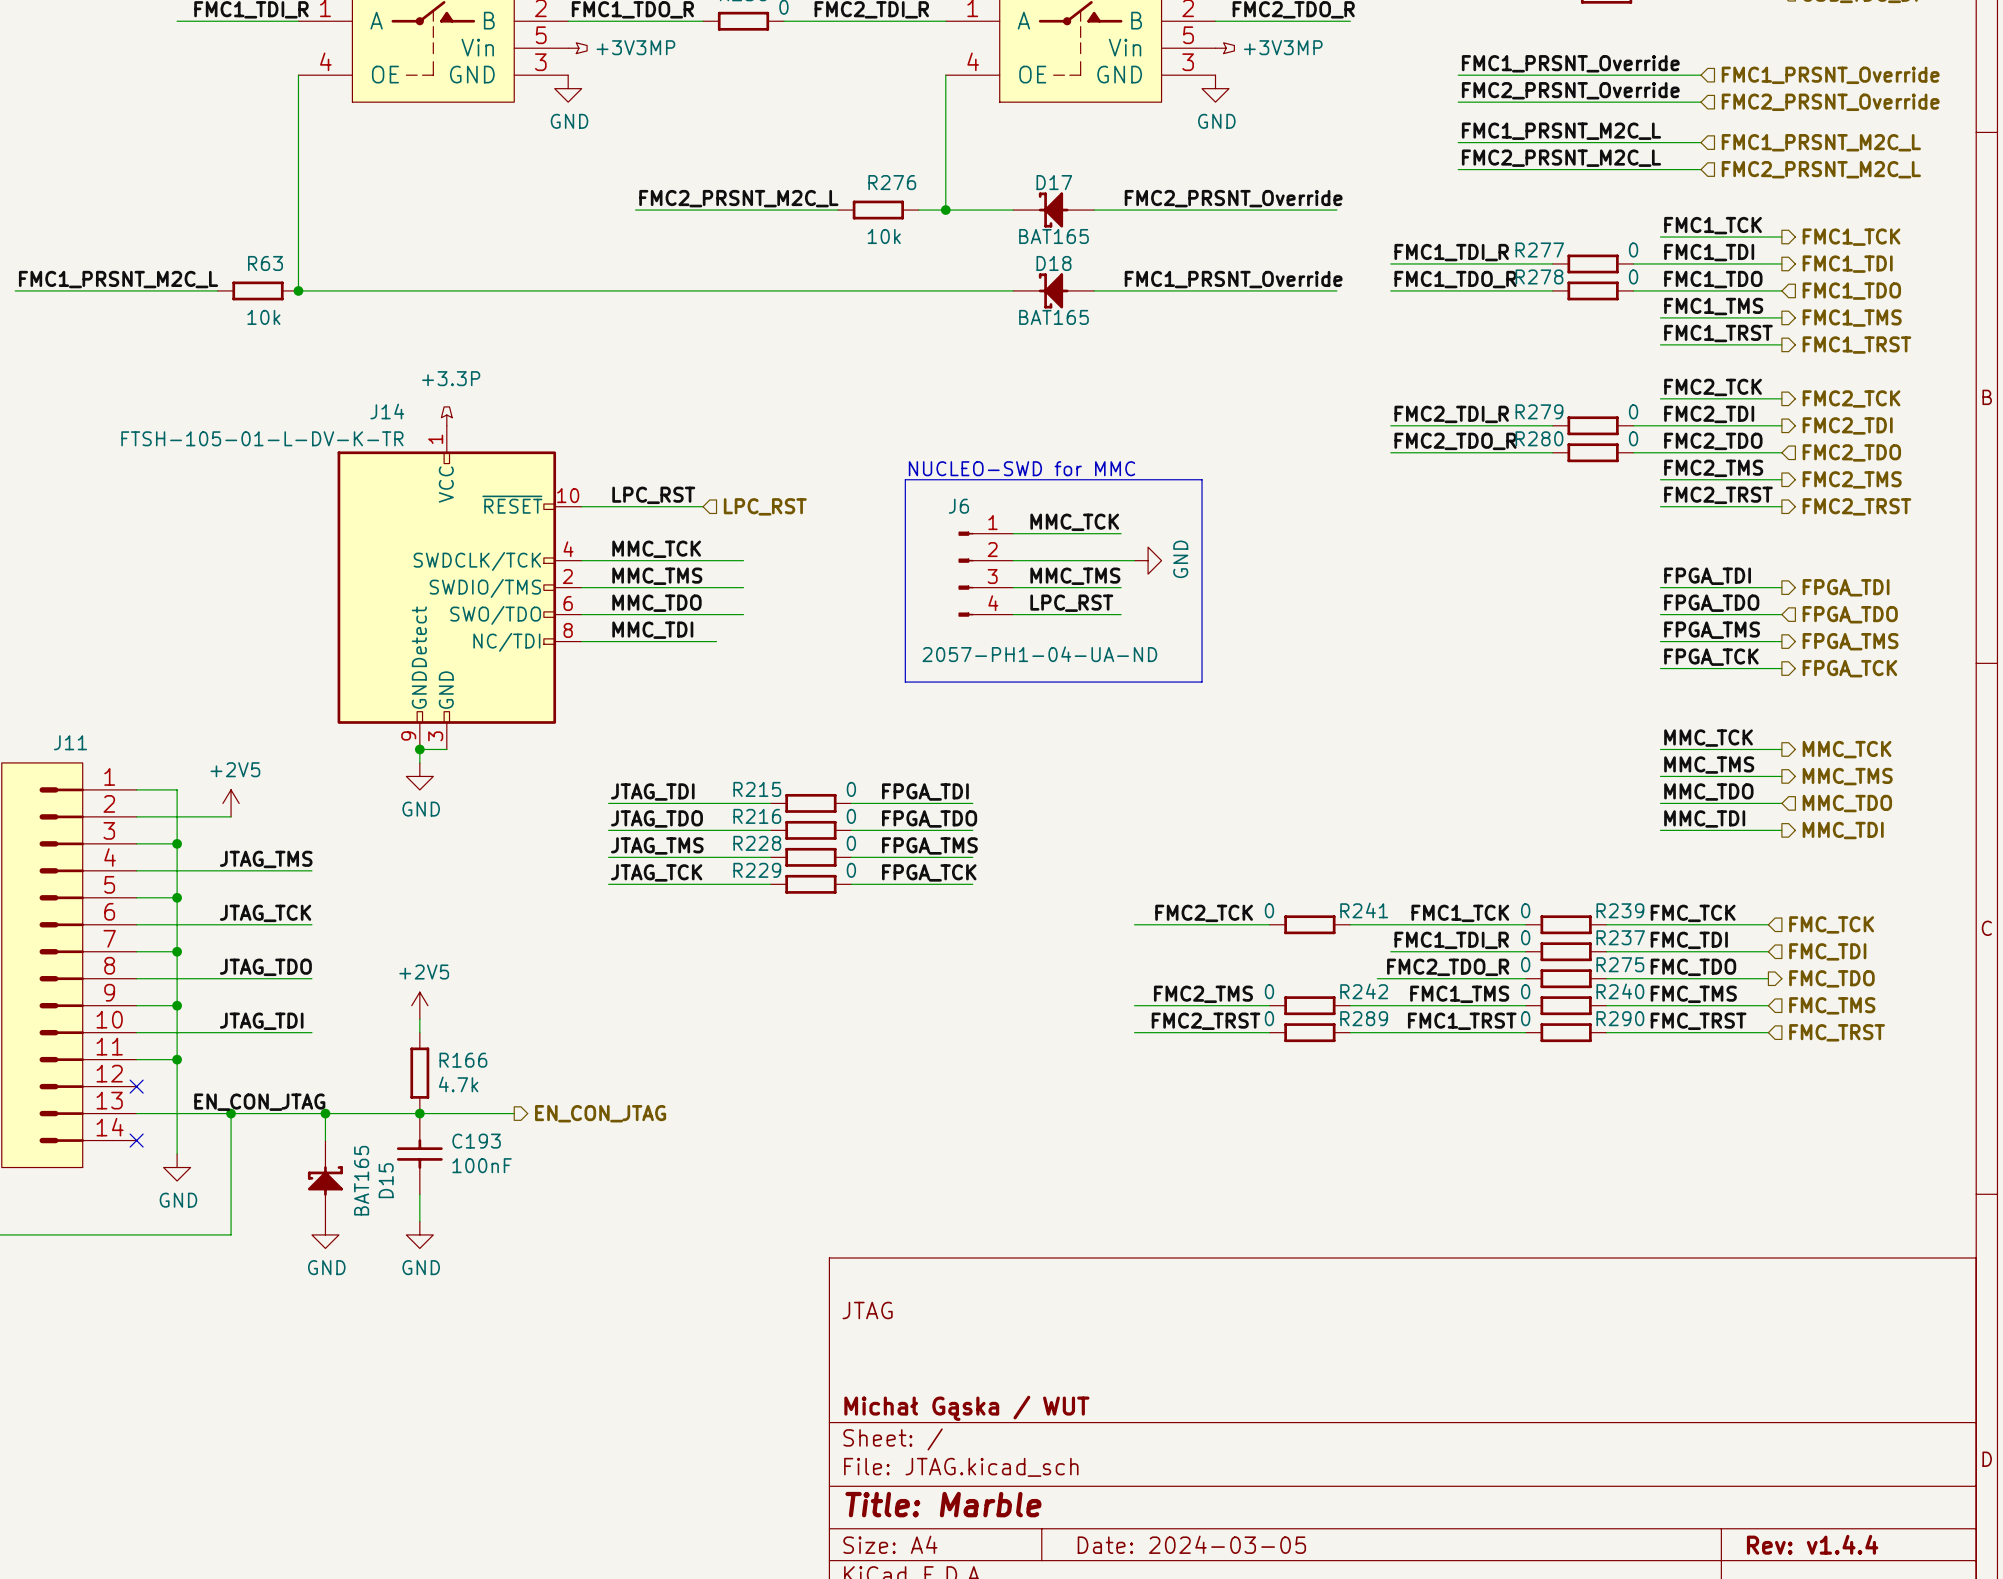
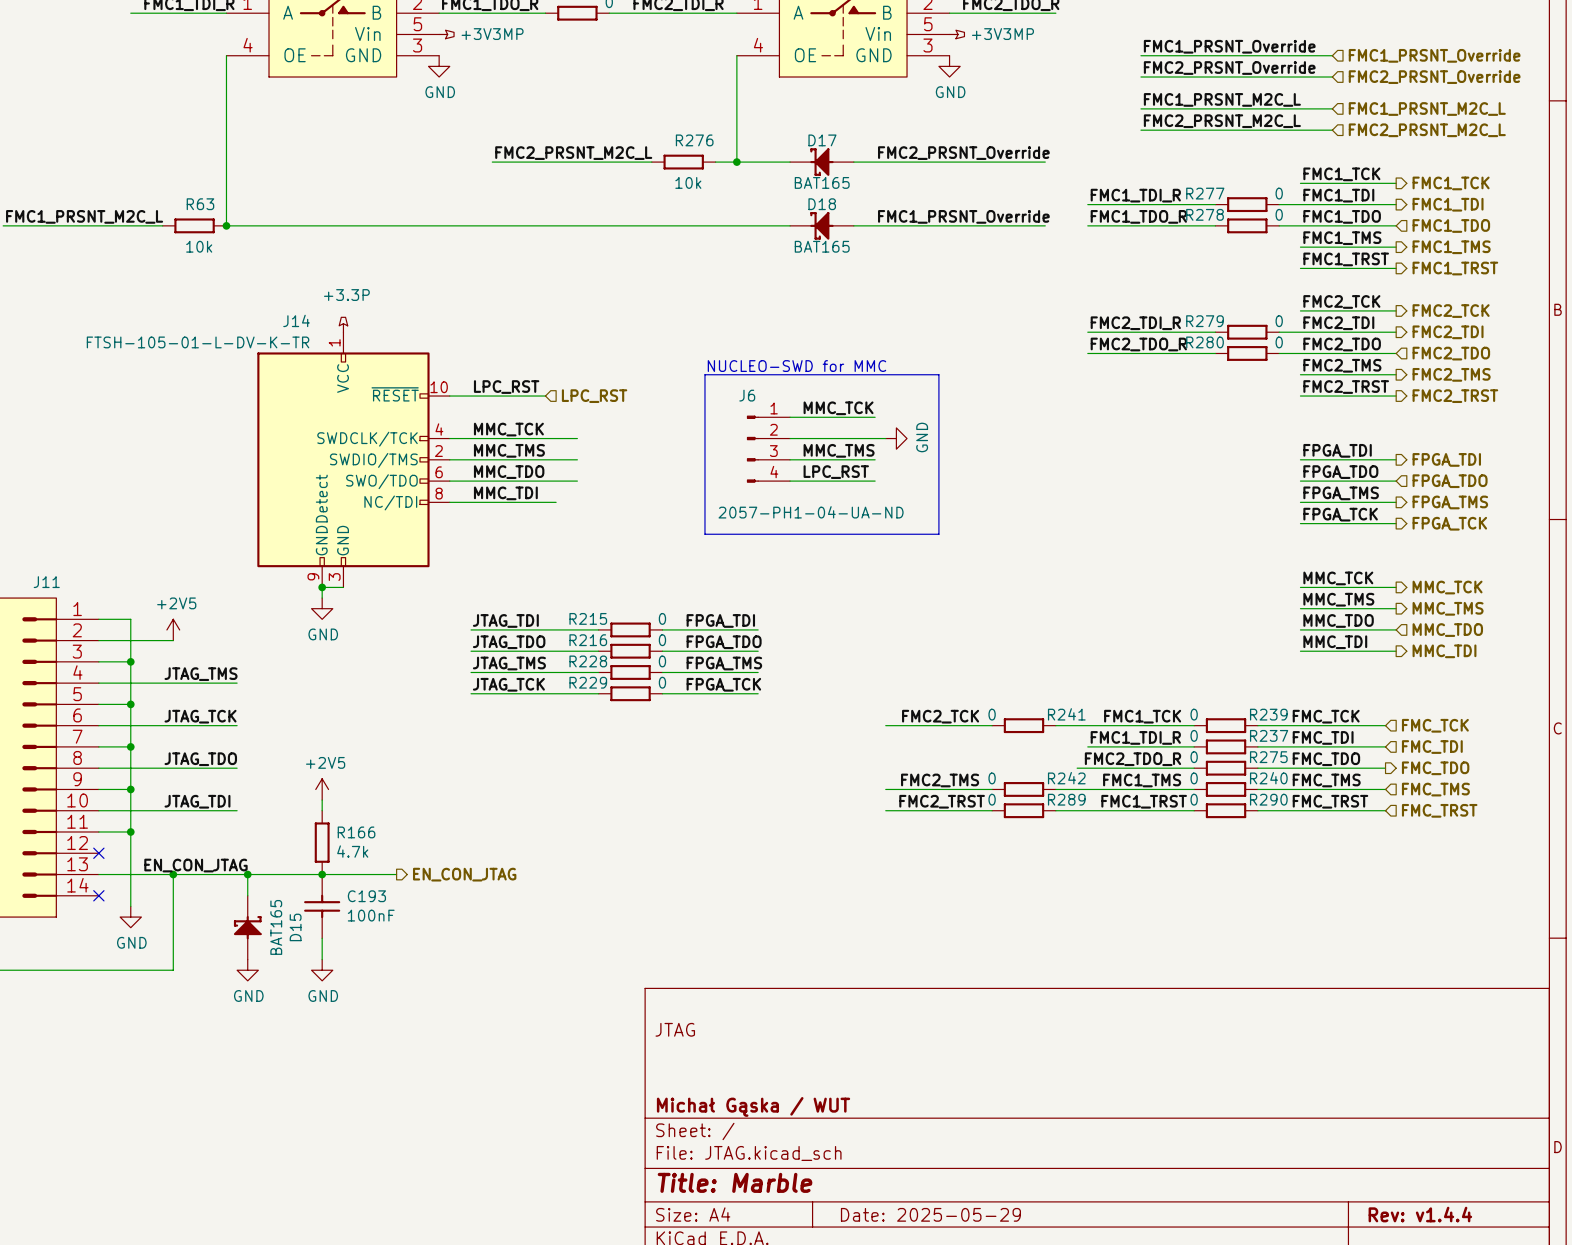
title block: Date: 2024-03-05 (1191, 1544) -> Date: 2025-05-29 (930, 1214)

